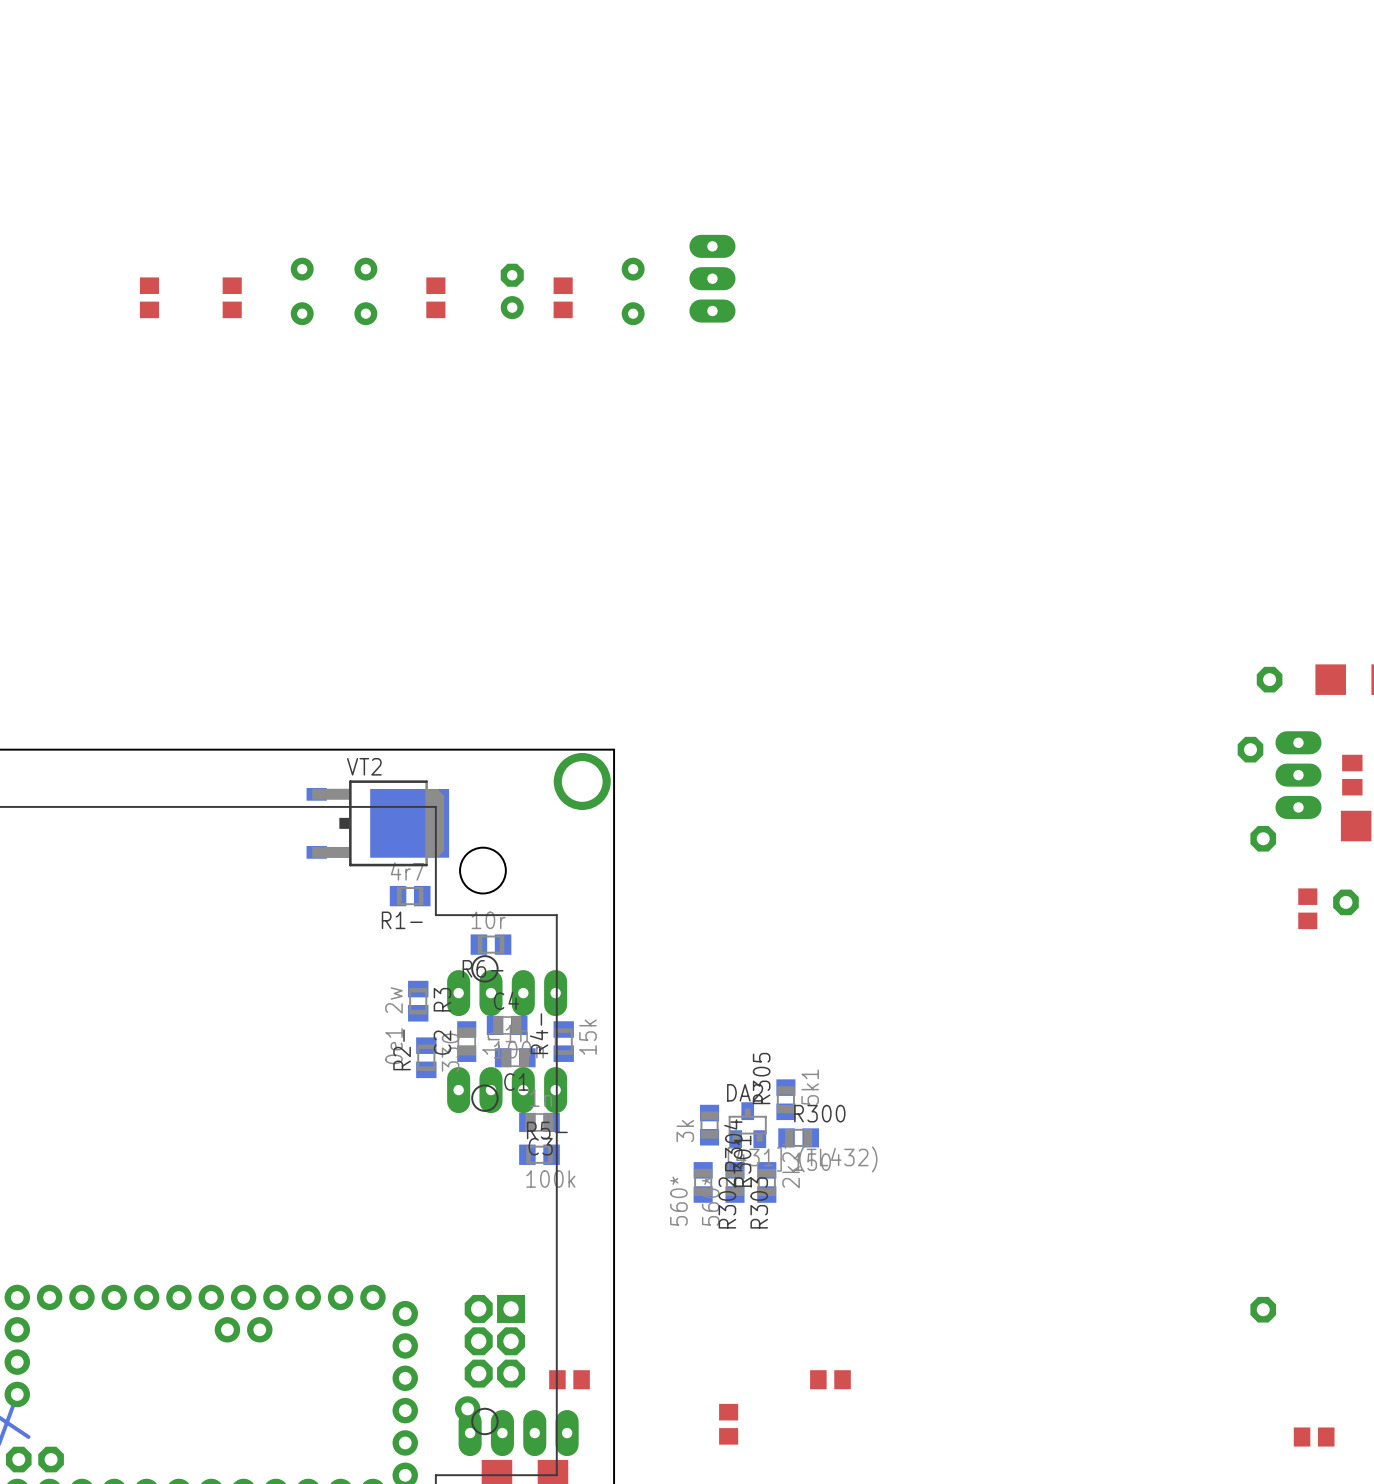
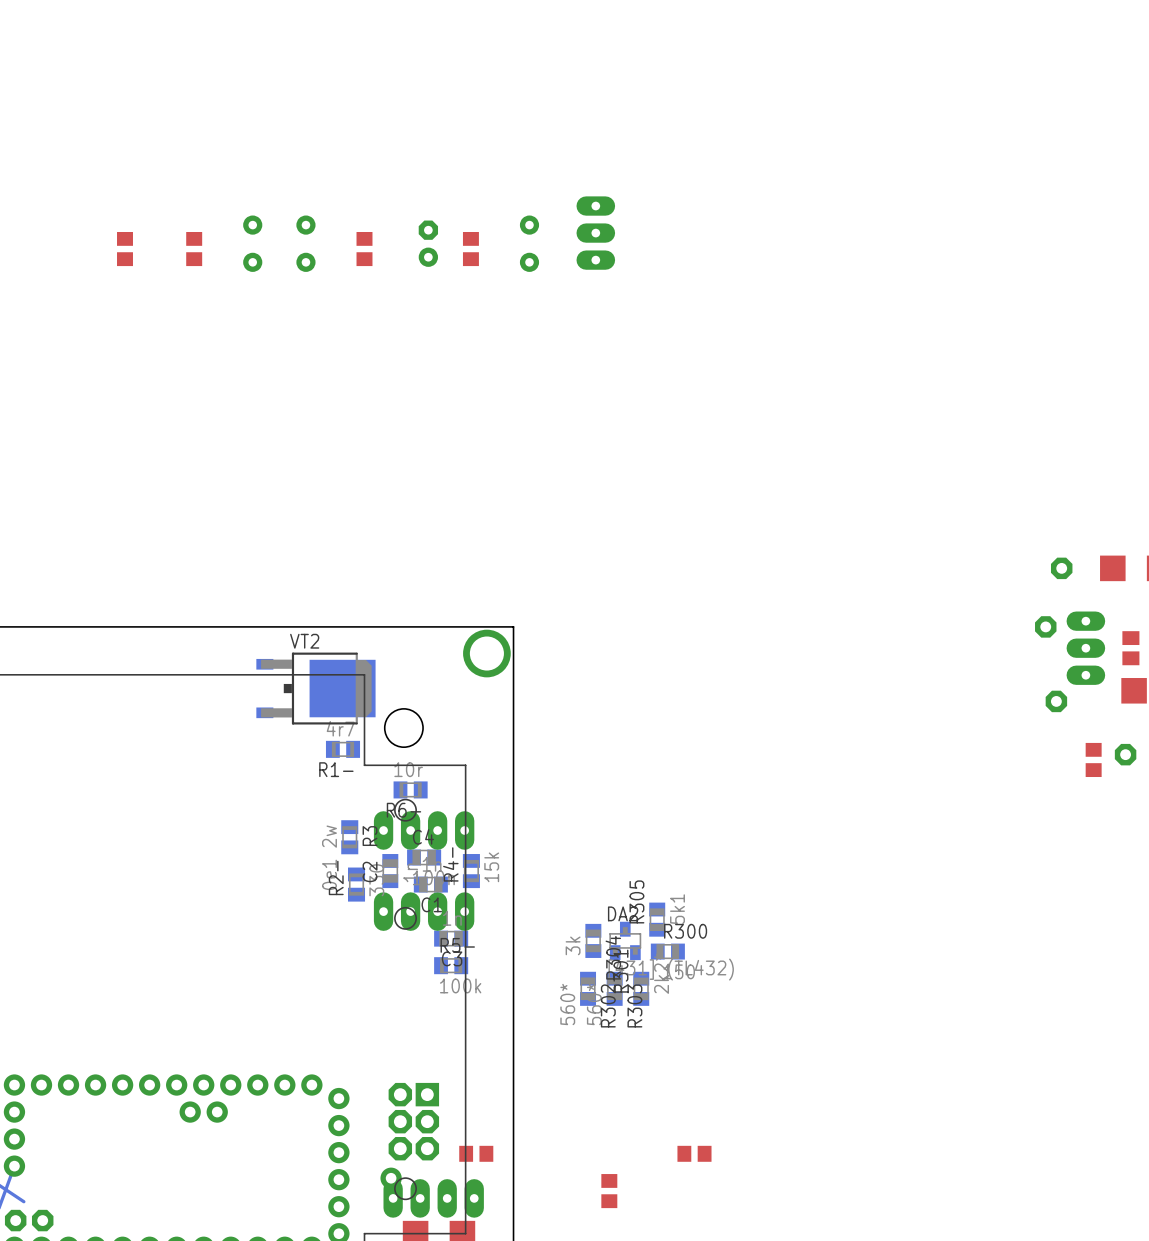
part: (1263, 1309) -> none
part: (1314, 1437) -> none

